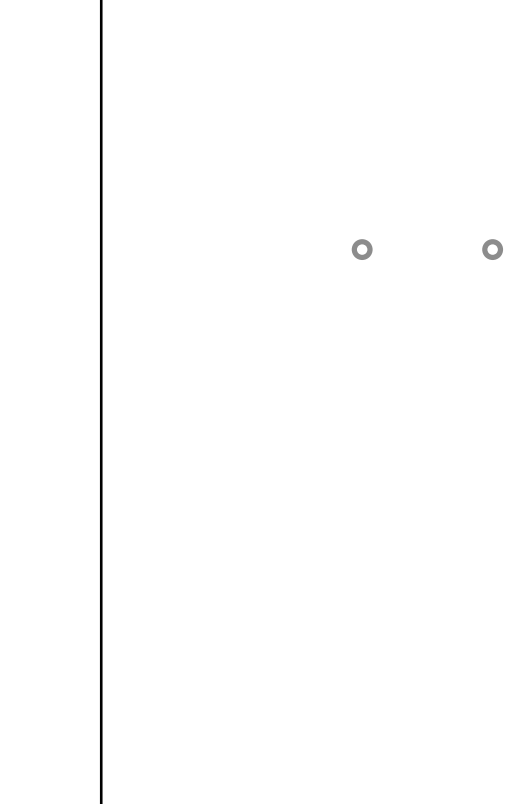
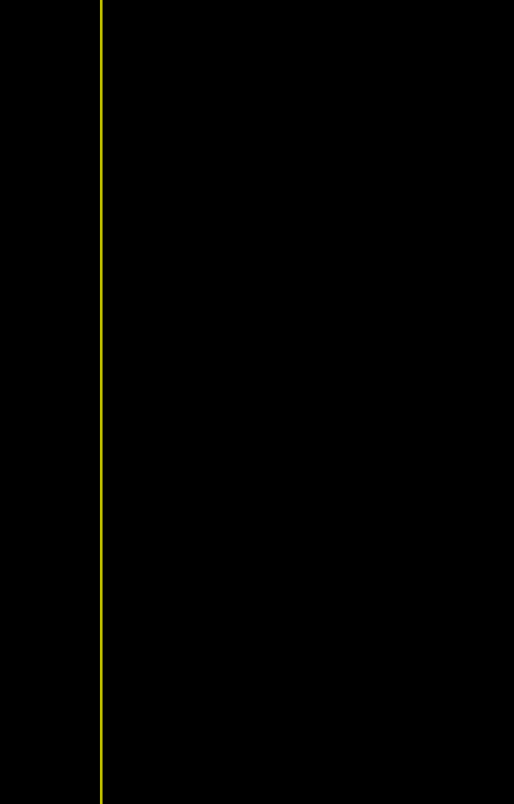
via: (362, 249) -> none
via: (492, 249) -> none

